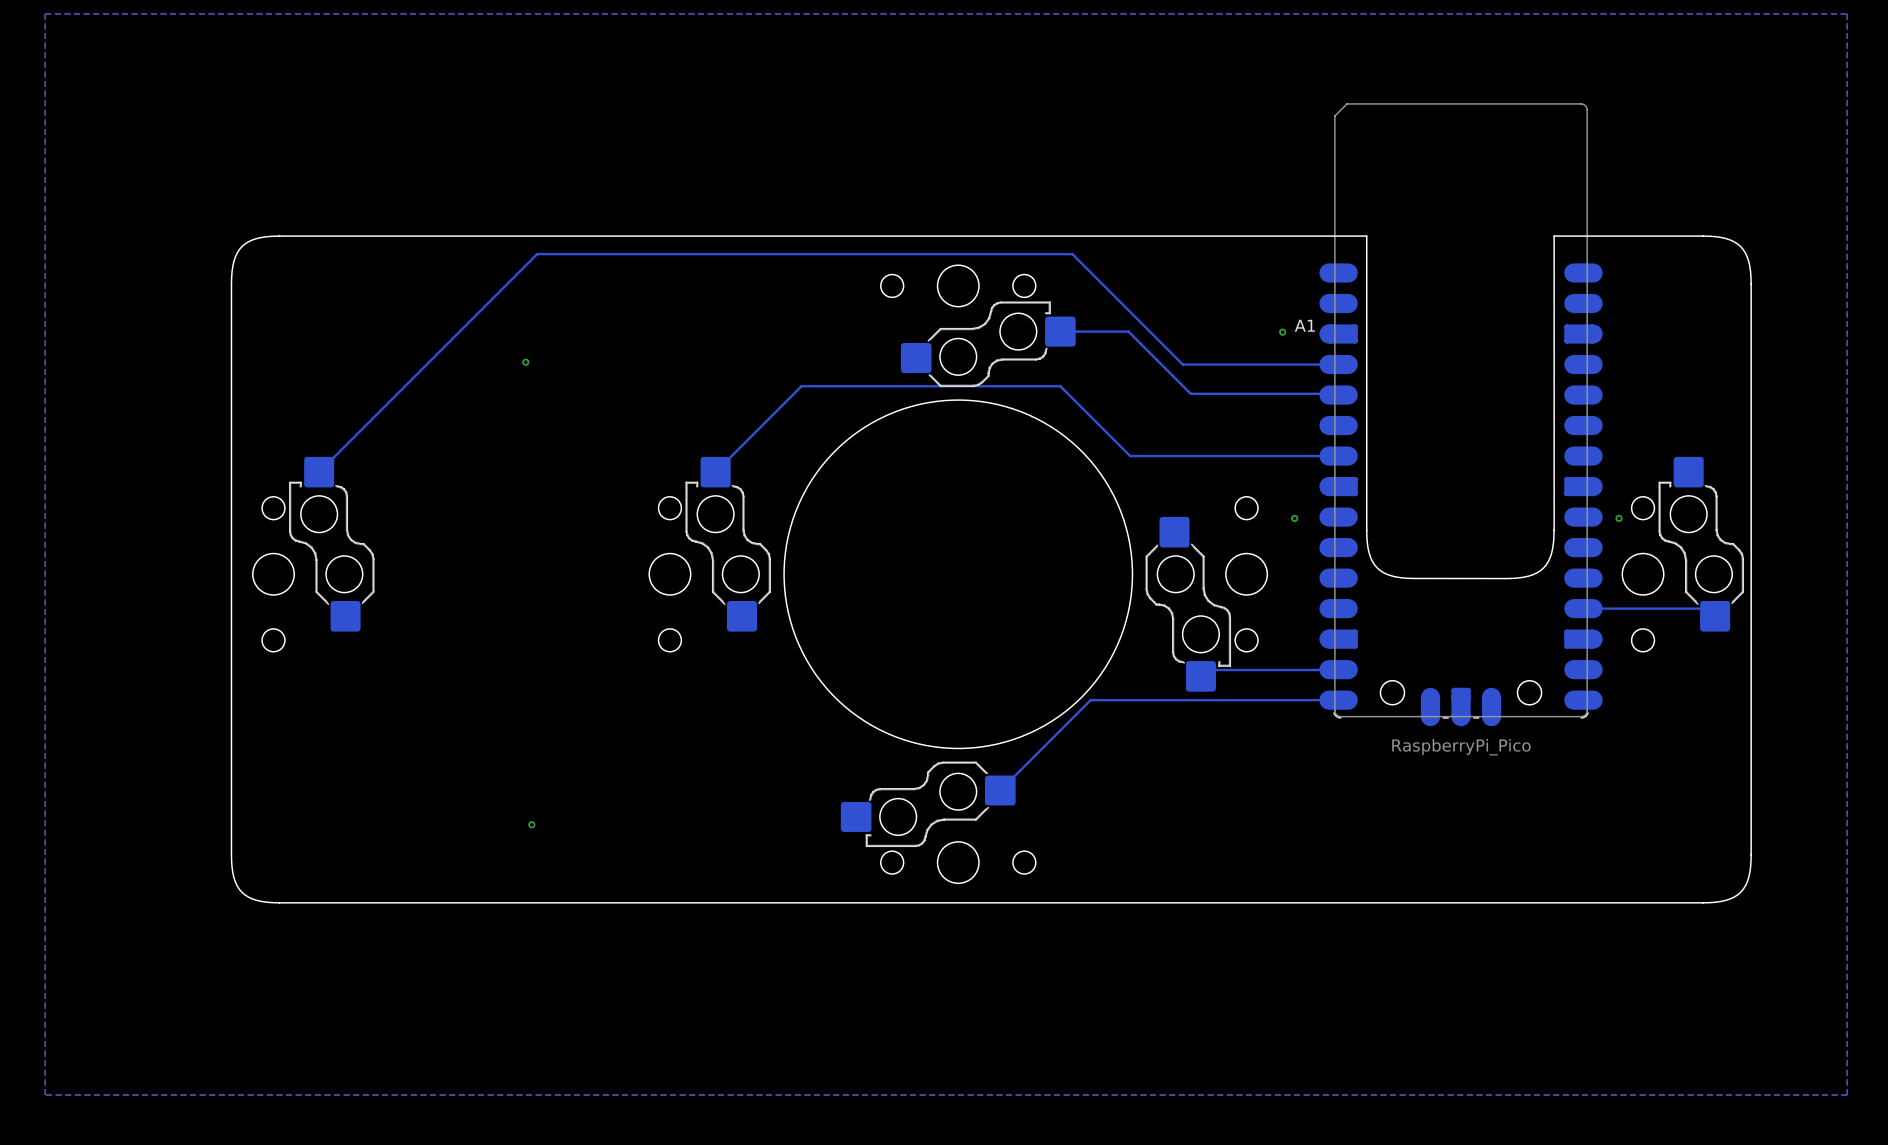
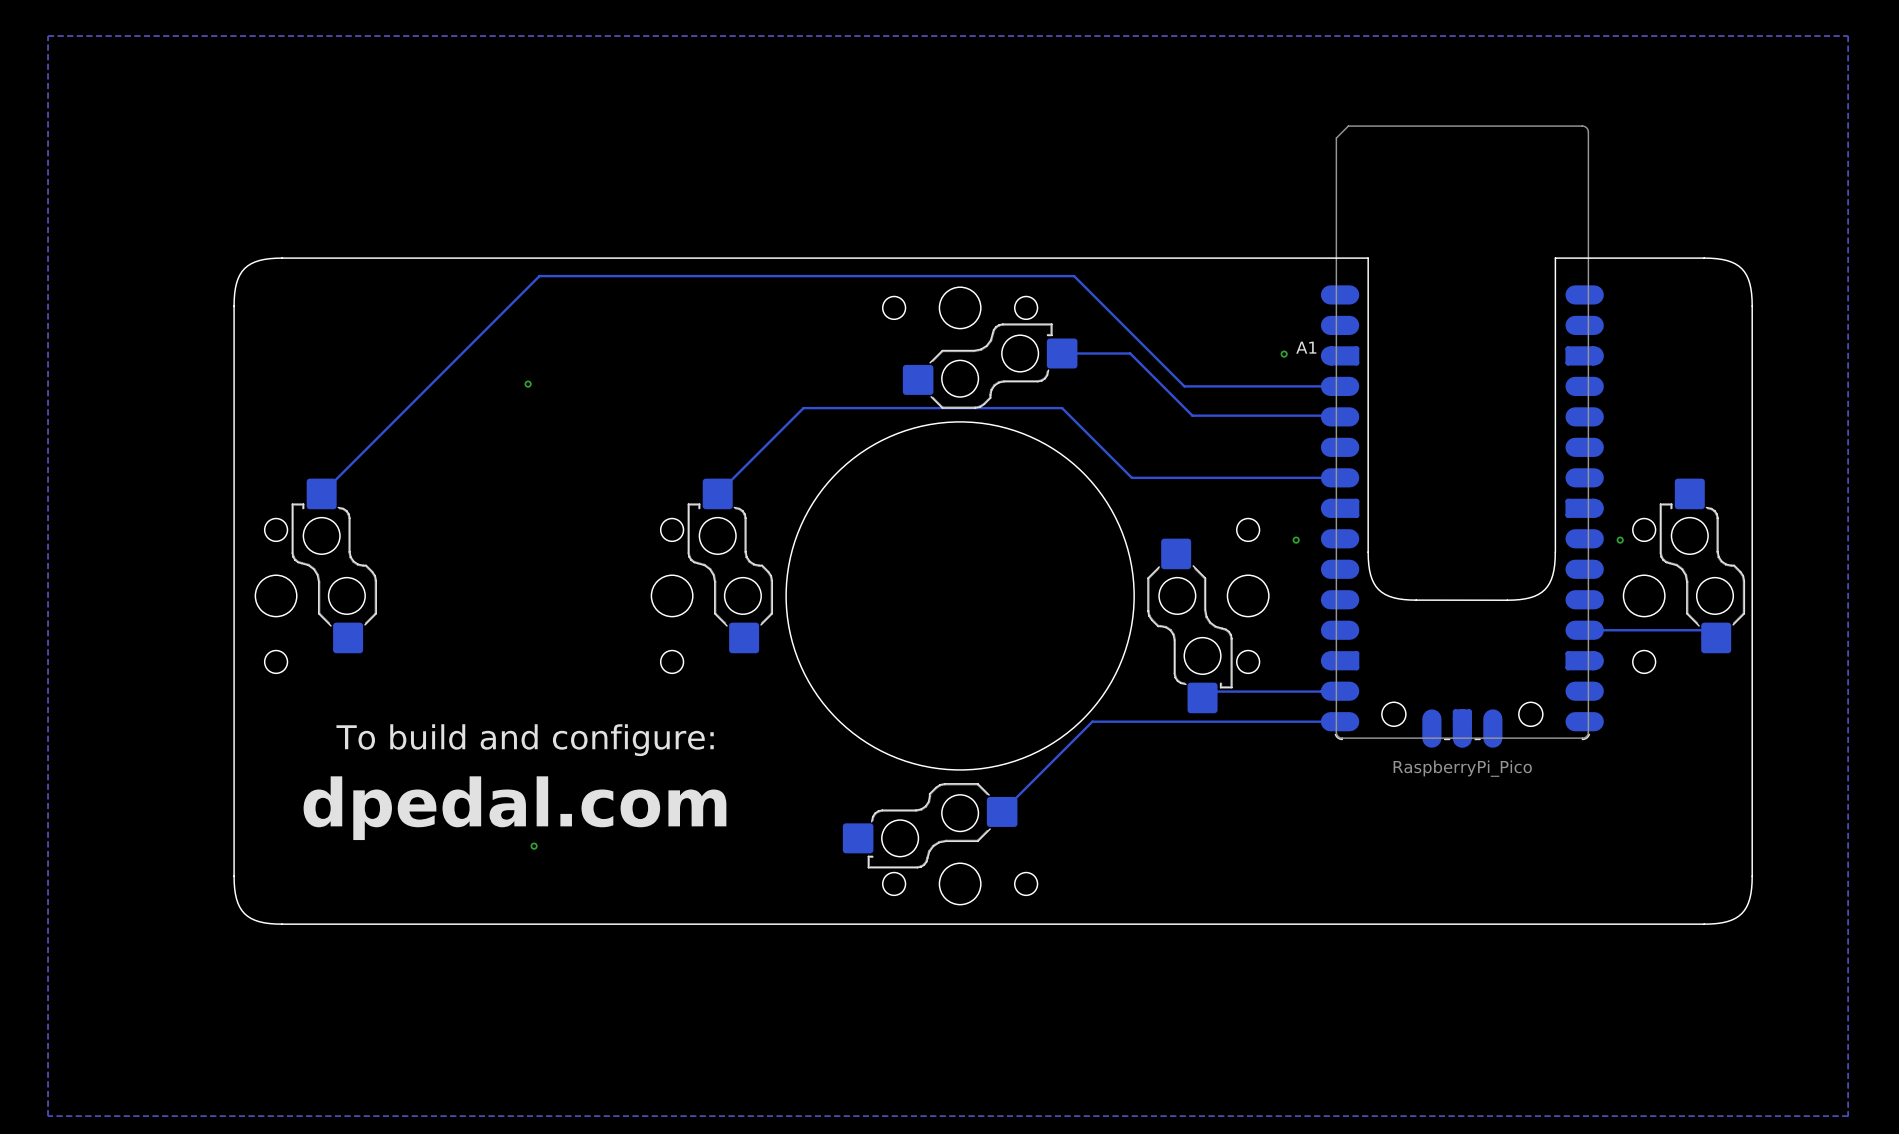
text: none -> To build and configure: (525, 740)
text: none -> dpedal.com (514, 808)

